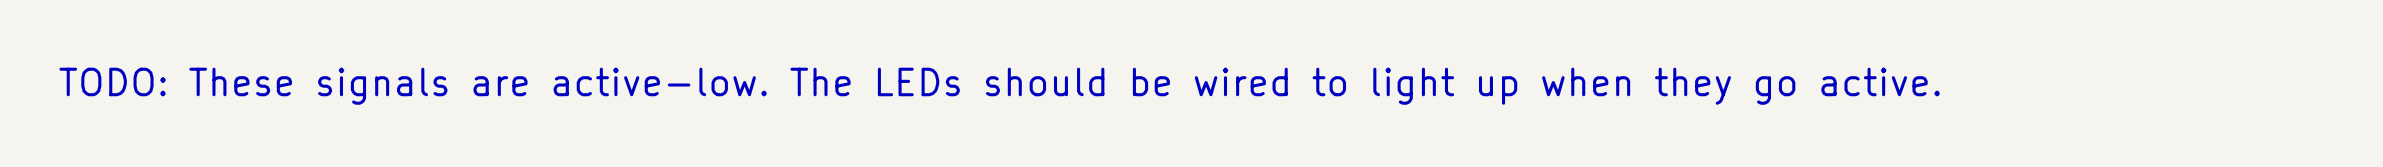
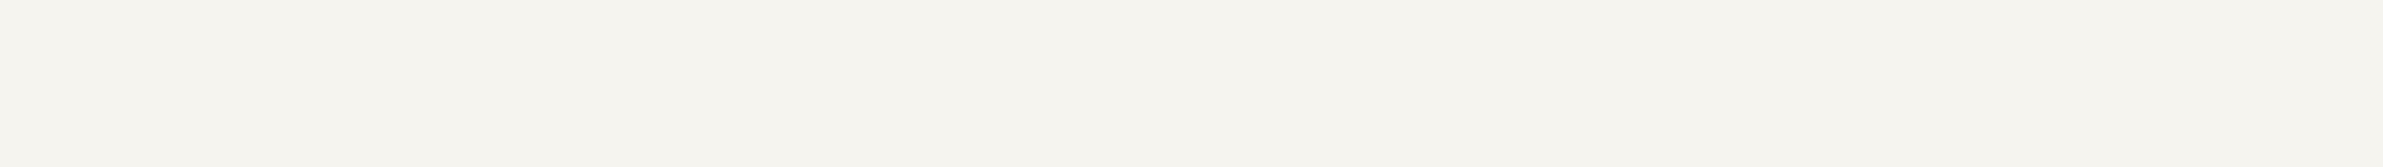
text: TODO: These signals are active-low. The LEDs should be wired to light up when they go active. (999, 86) -> none

